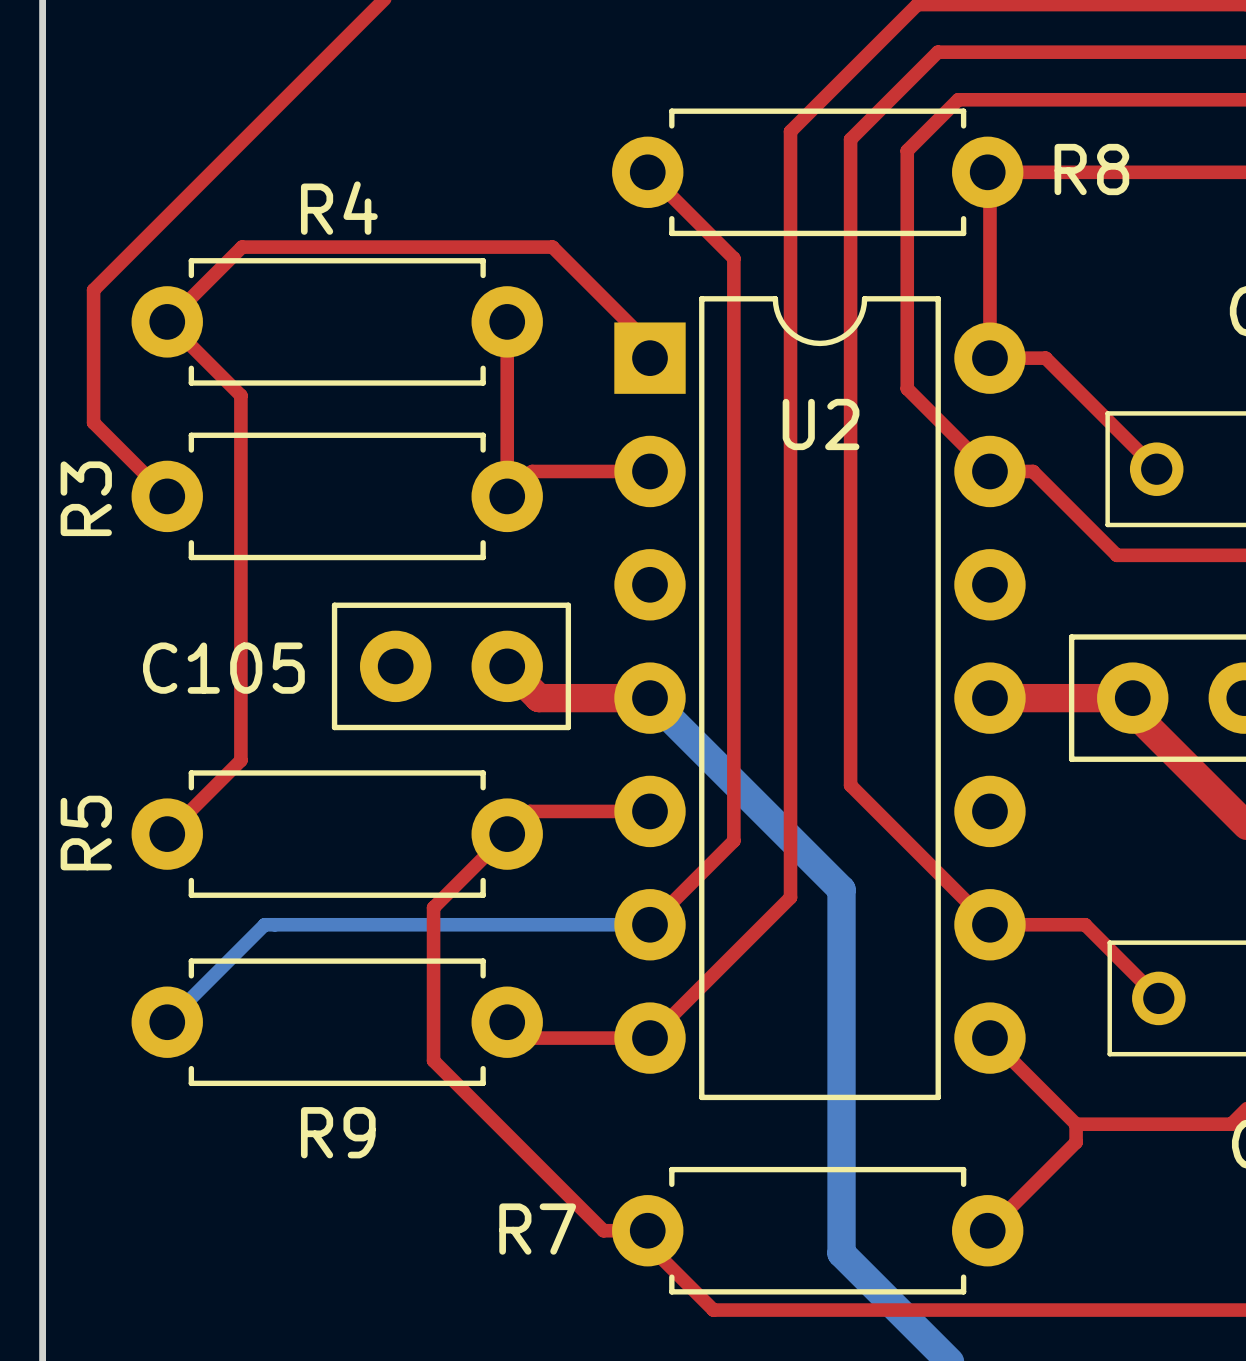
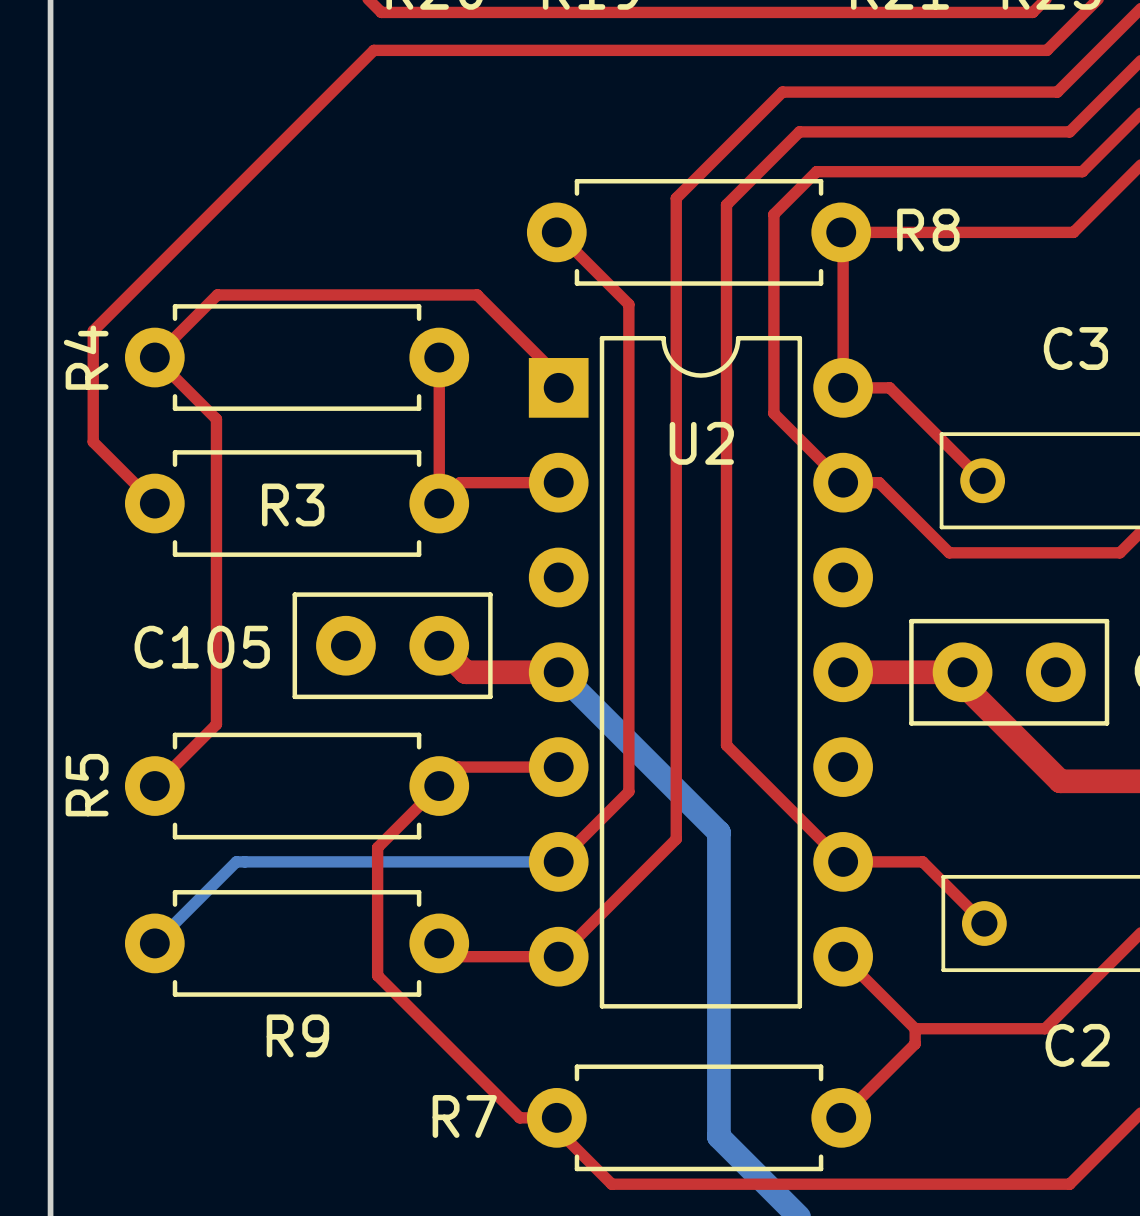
R4 name rotation: 0° (339, 208) -> 90° counterclockwise (86, 357)
R4 name position: R4 (339, 208) -> R4 (86, 357)
R3 name rotation: 0° (86, 498) -> 90° clockwise (293, 504)
R3 name position: R3 (86, 498) -> R3 (293, 504)

